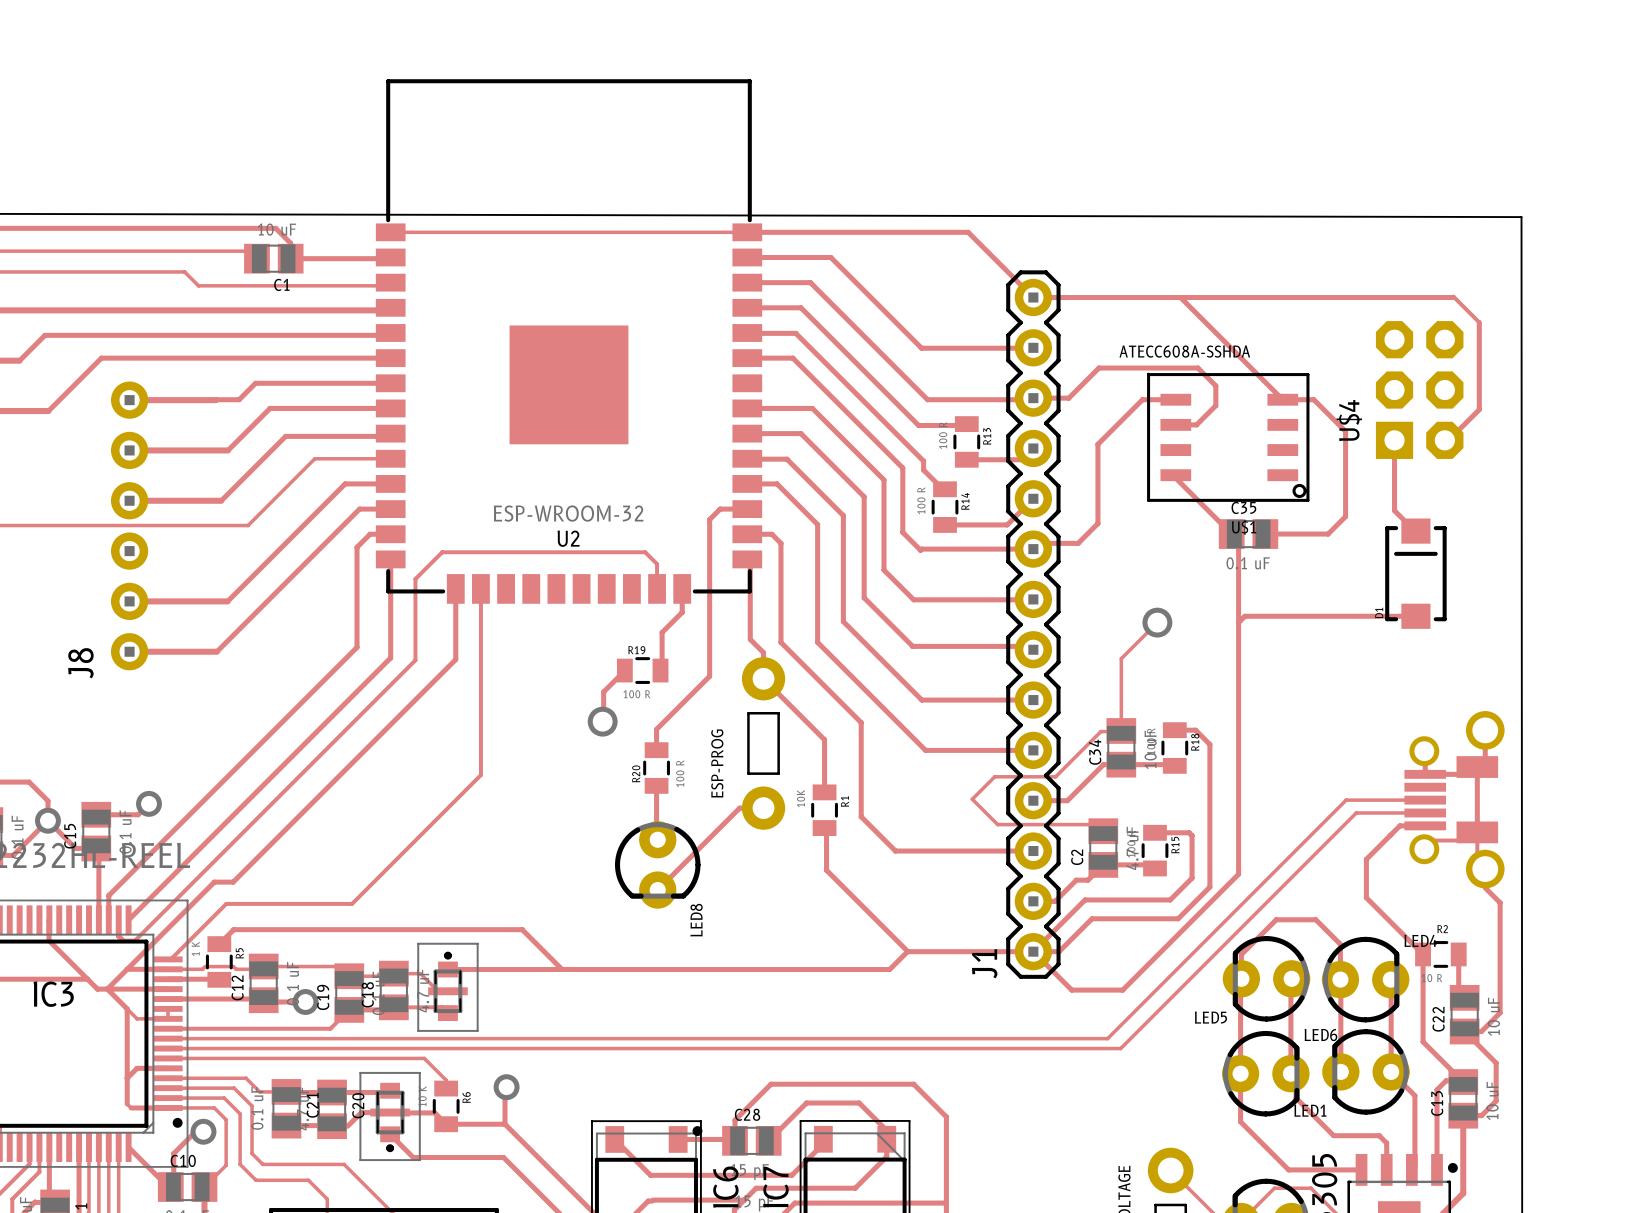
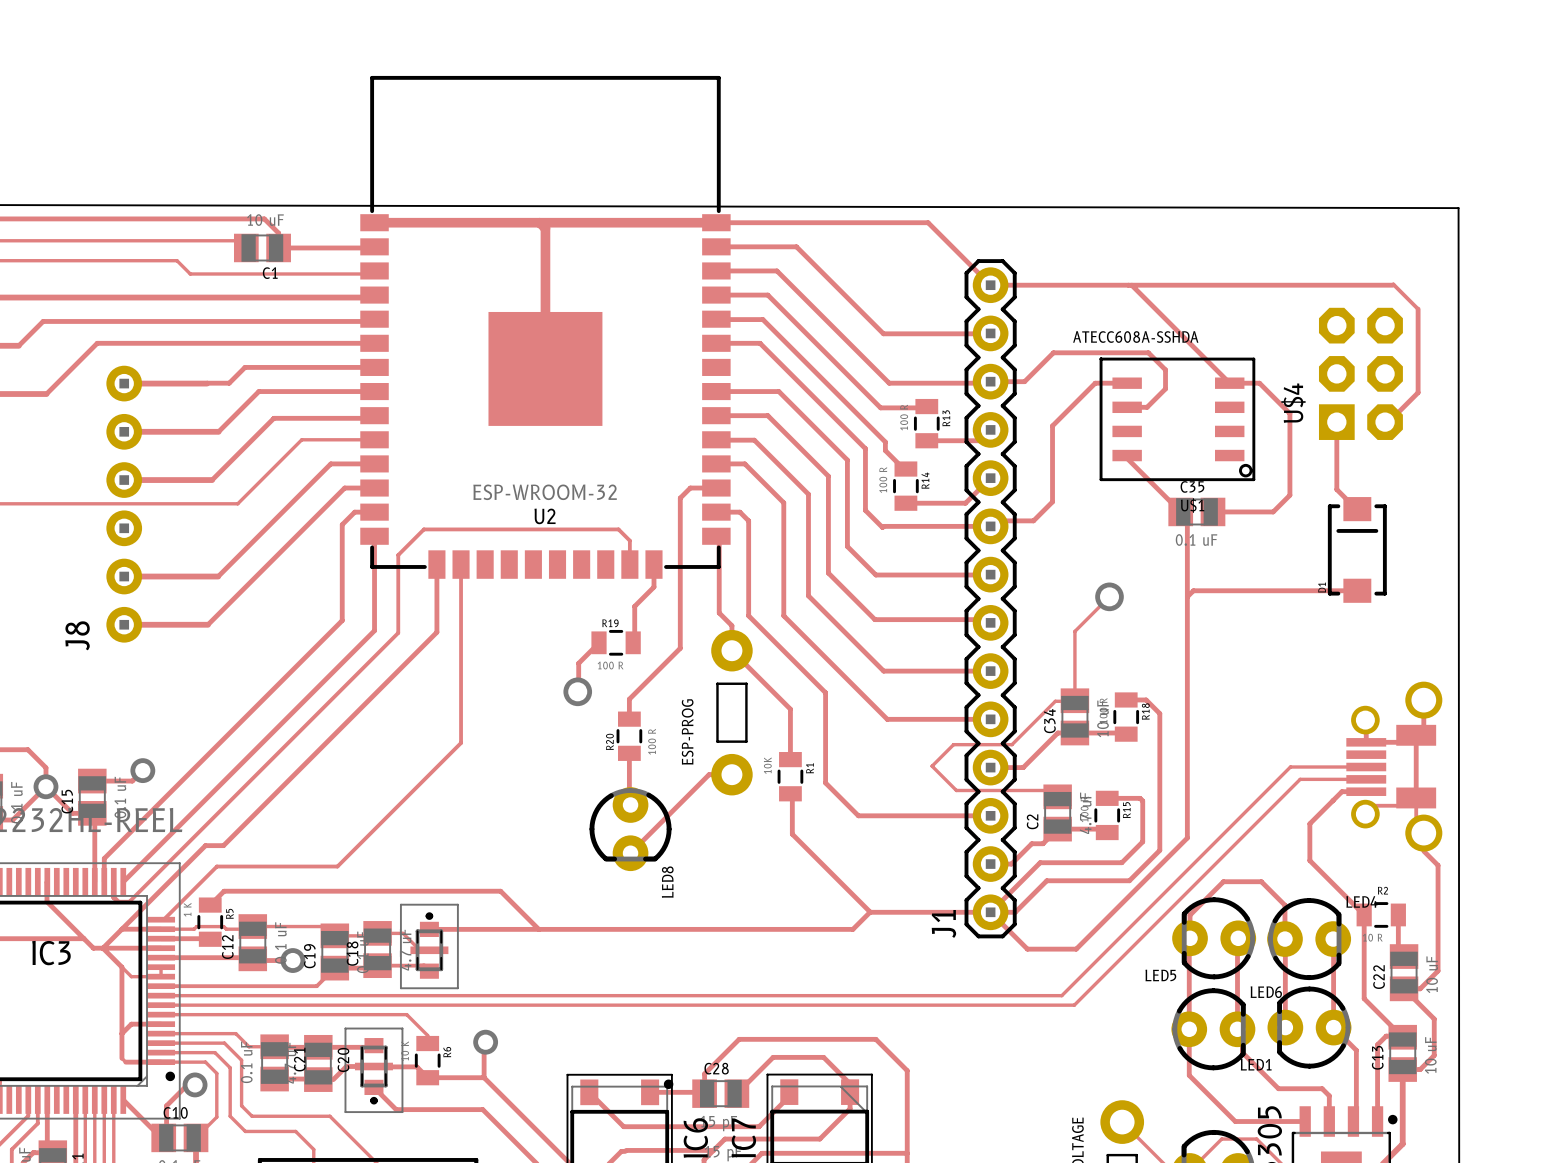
track width: thin (390, 232) (747, 232) -> thick (374, 222) (716, 222)
track: none -> (539, 222) (545, 228) (545, 368)

